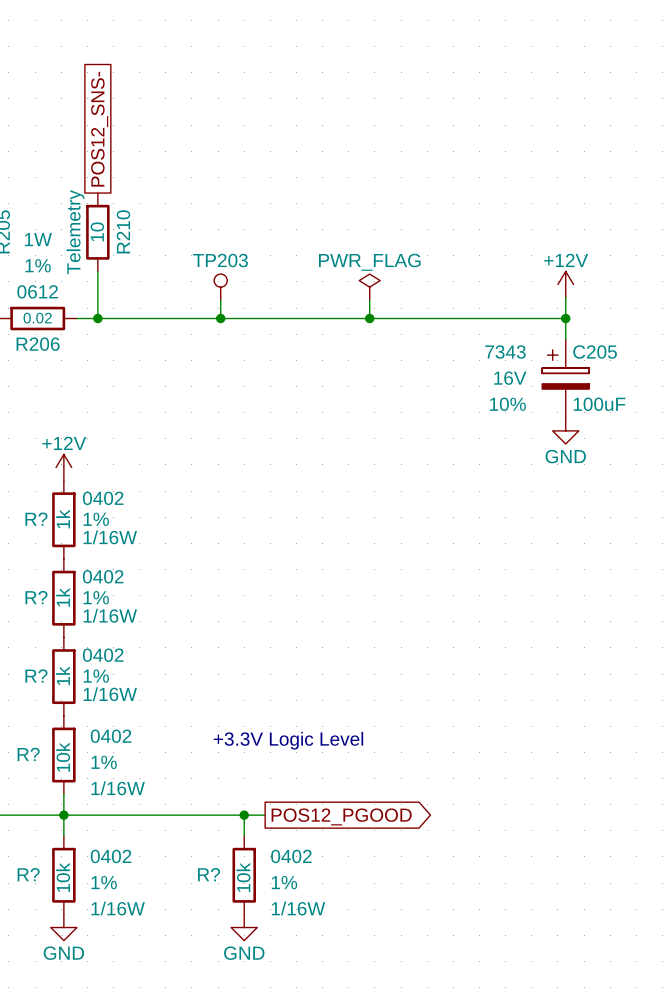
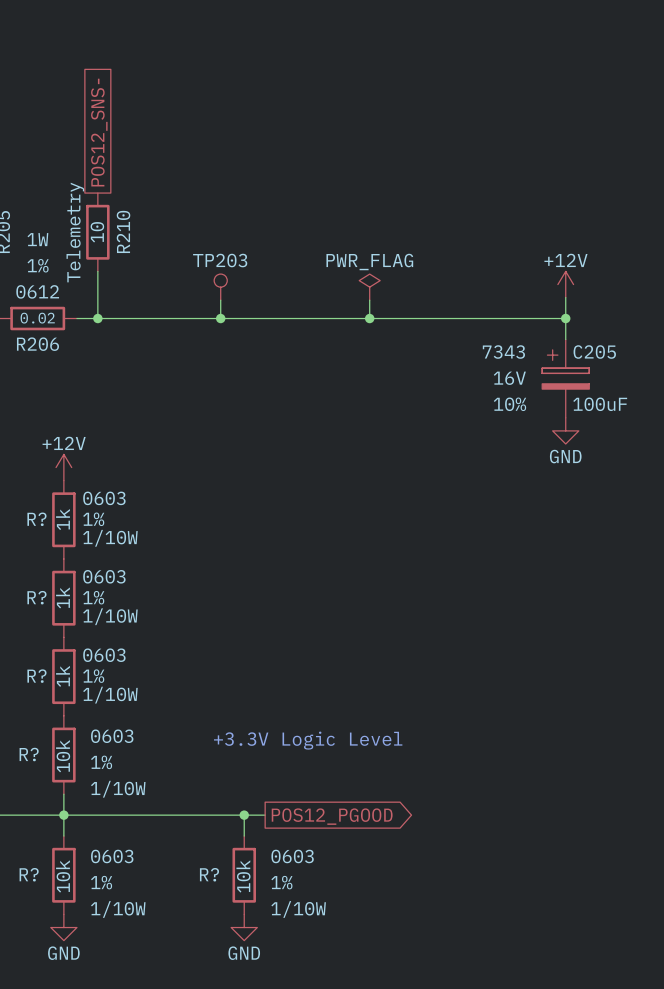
R? text: 0402 (103, 498) -> 0603 (104, 498)
R? text: 1/16W (110, 537) -> 1/10W (110, 538)
R? text: 0402 (103, 576) -> 0603 (104, 576)
R? text: 1/16W (110, 615) -> 1/10W (110, 616)
R? text: 0402 (103, 655) -> 0603 (104, 655)
R? text: 1/16W (110, 694) -> 1/10W (110, 695)
R? text: 0402 (111, 736) -> 0603 (112, 736)
R? text: 1/16W (118, 788) -> 1/10W (118, 789)
R? text: 0402 (111, 856) -> 0603 (112, 856)
R? text: 0402 (291, 856) -> 0603 (292, 856)
R? text: 1/16W (118, 908) -> 1/10W (118, 909)
R? text: 1/16W (298, 908) -> 1/10W (298, 909)

